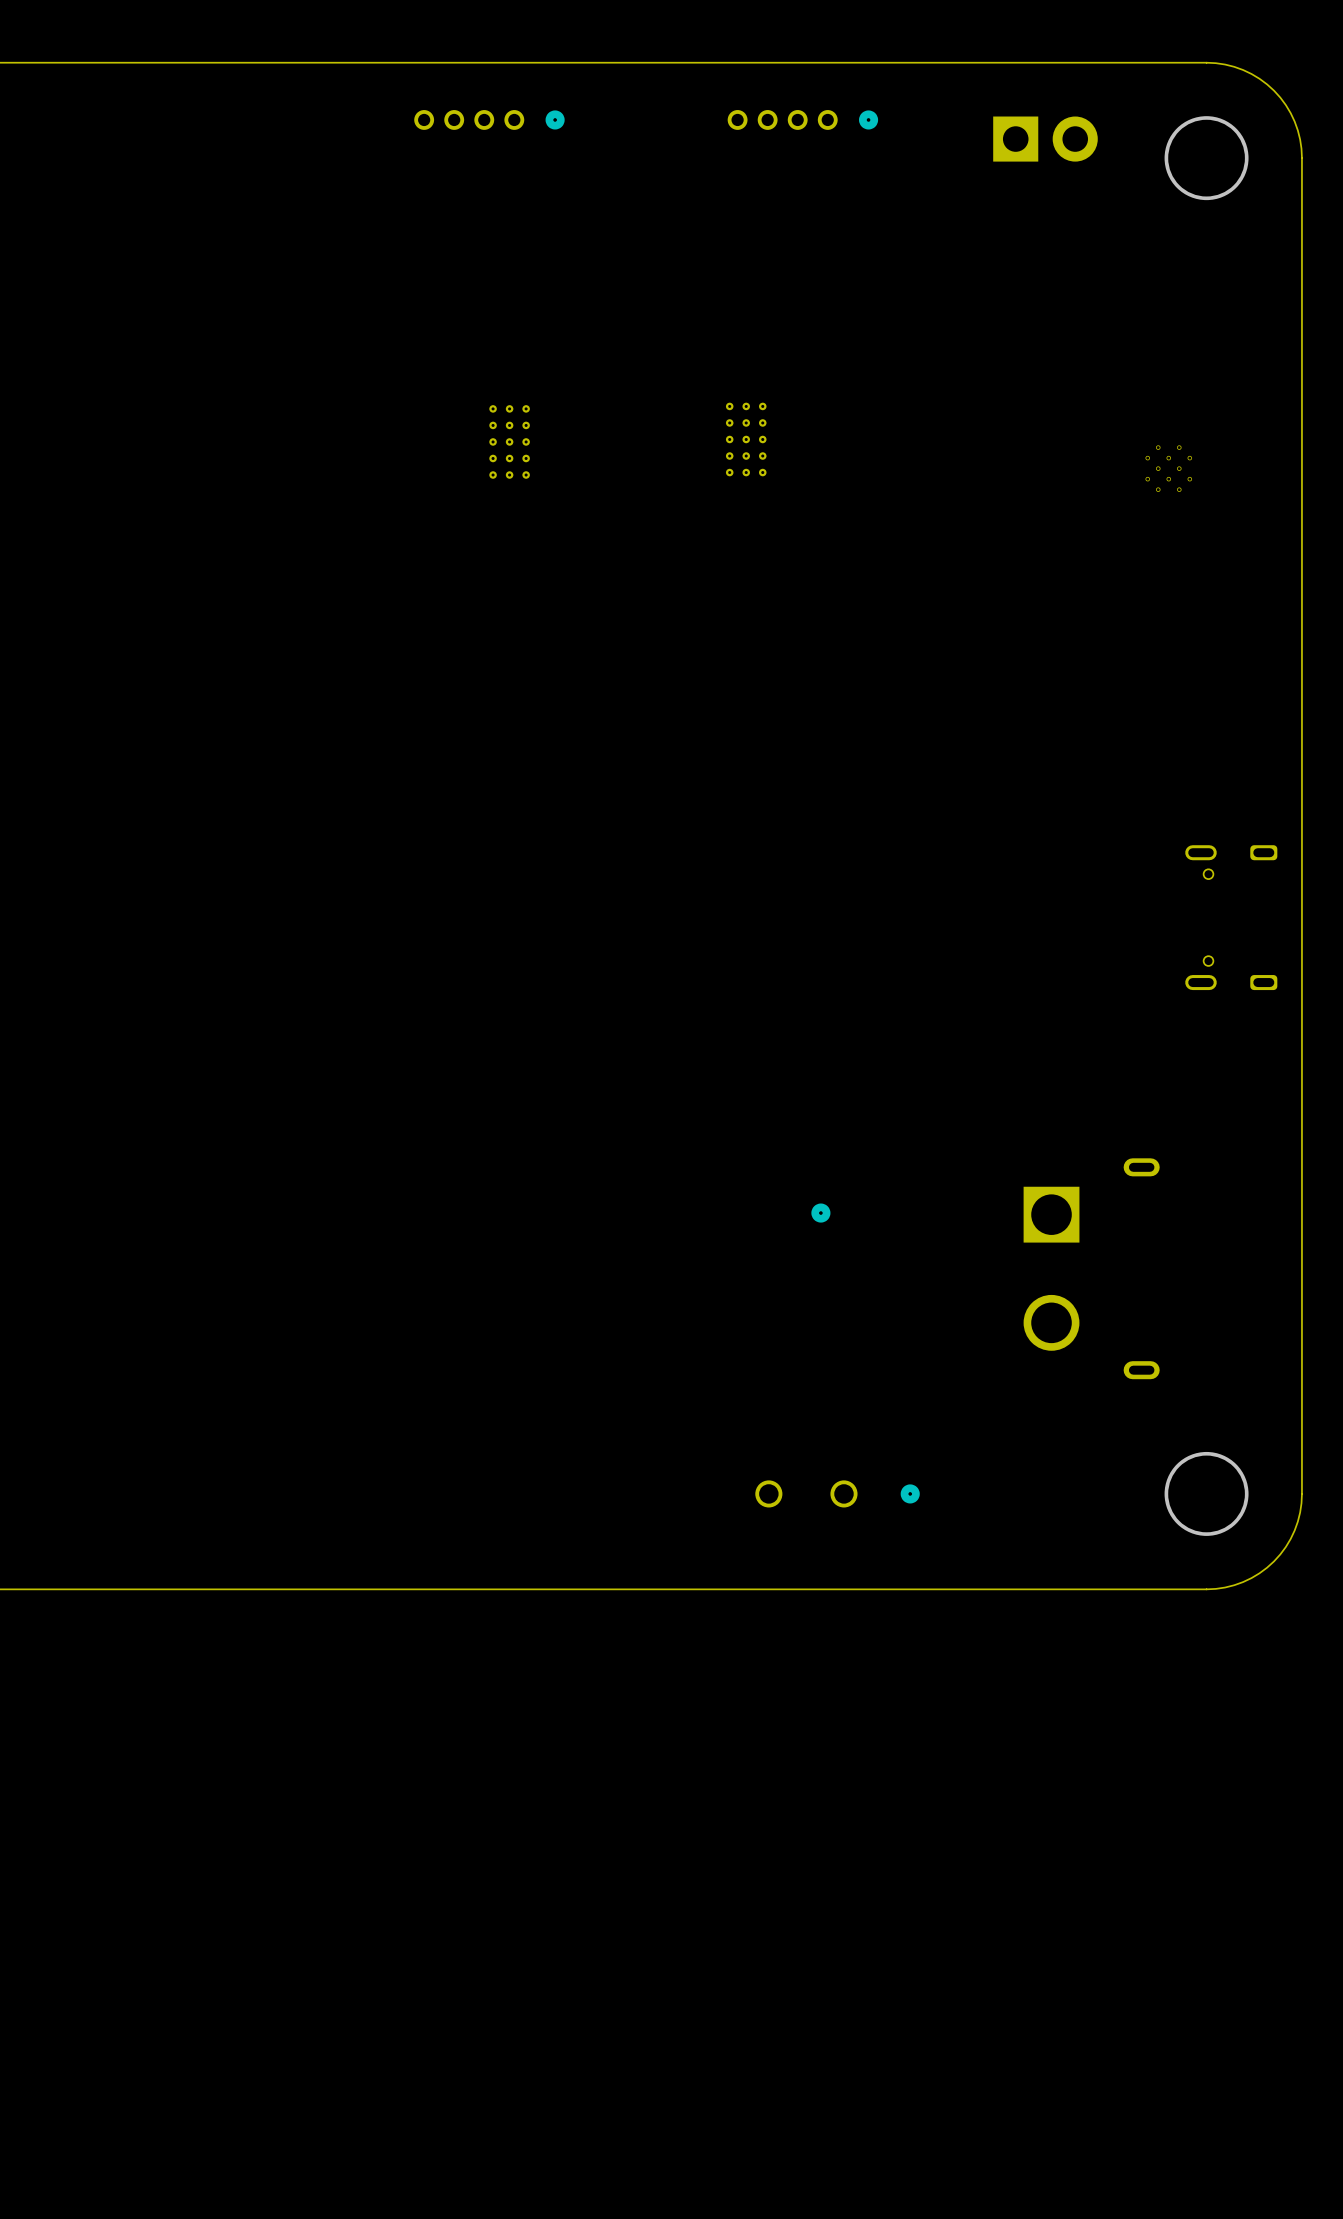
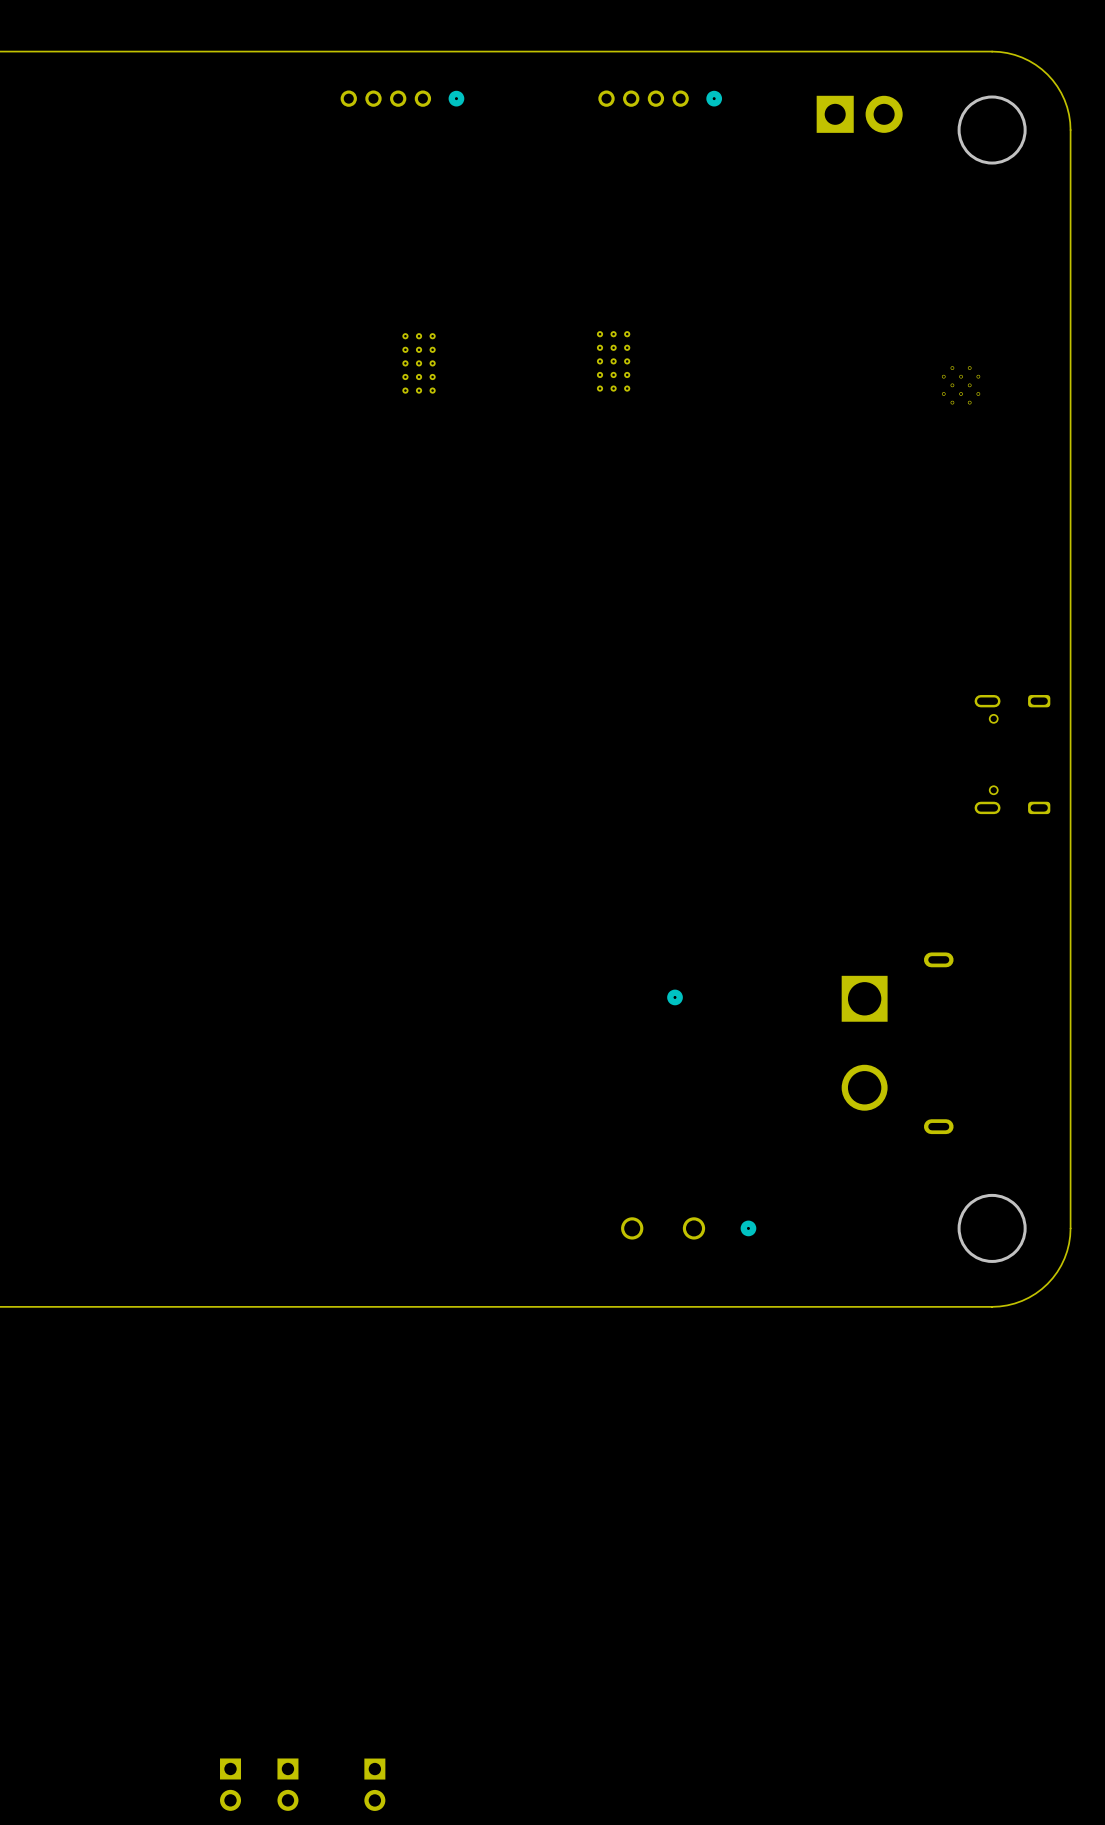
part: none -> (230, 1784)
part: none -> (287, 1784)
part: none -> (374, 1784)

